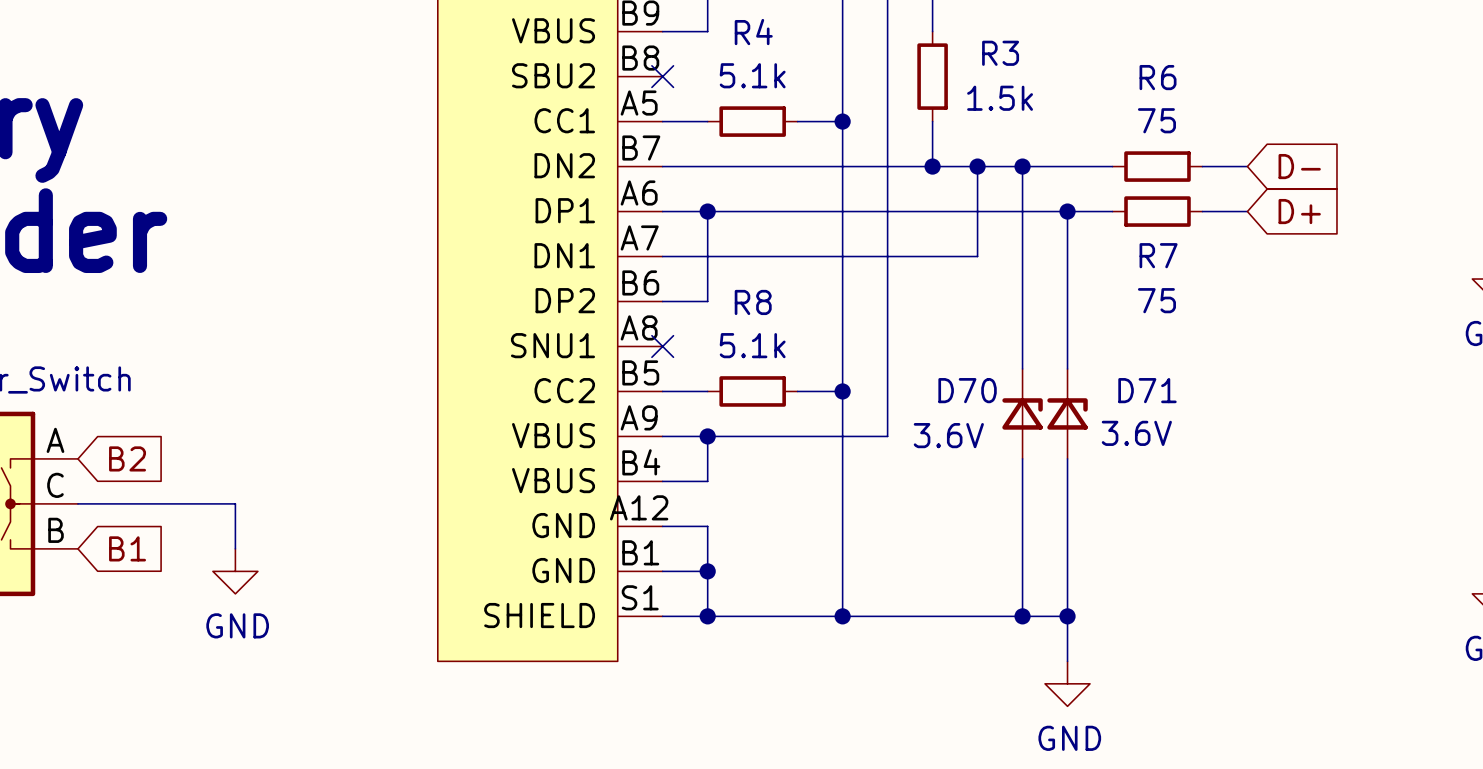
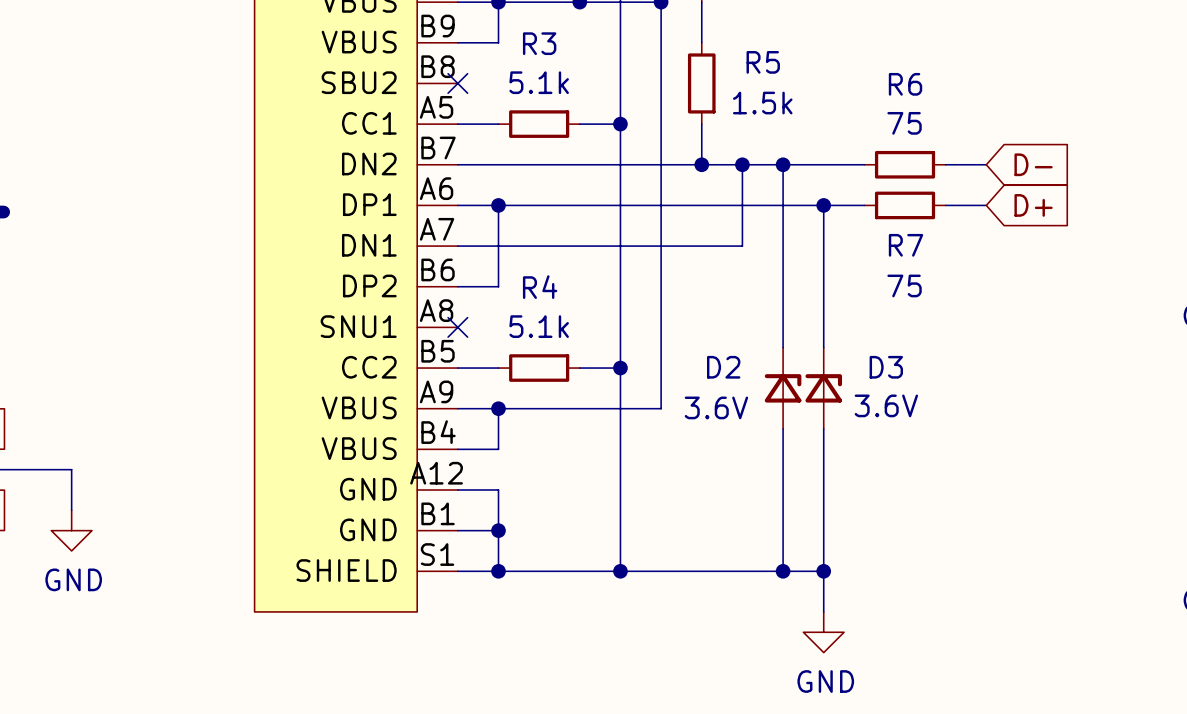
R4 name: R4 (753, 32) -> R3 (539, 43)
R3 name: R3 (1000, 53) -> R5 (763, 62)
R8 name: R8 (753, 302) -> R4 (540, 287)
D70 name: D70 (967, 390) -> D2 (723, 367)
D71 name: D71 (1147, 390) -> D3 (886, 367)

